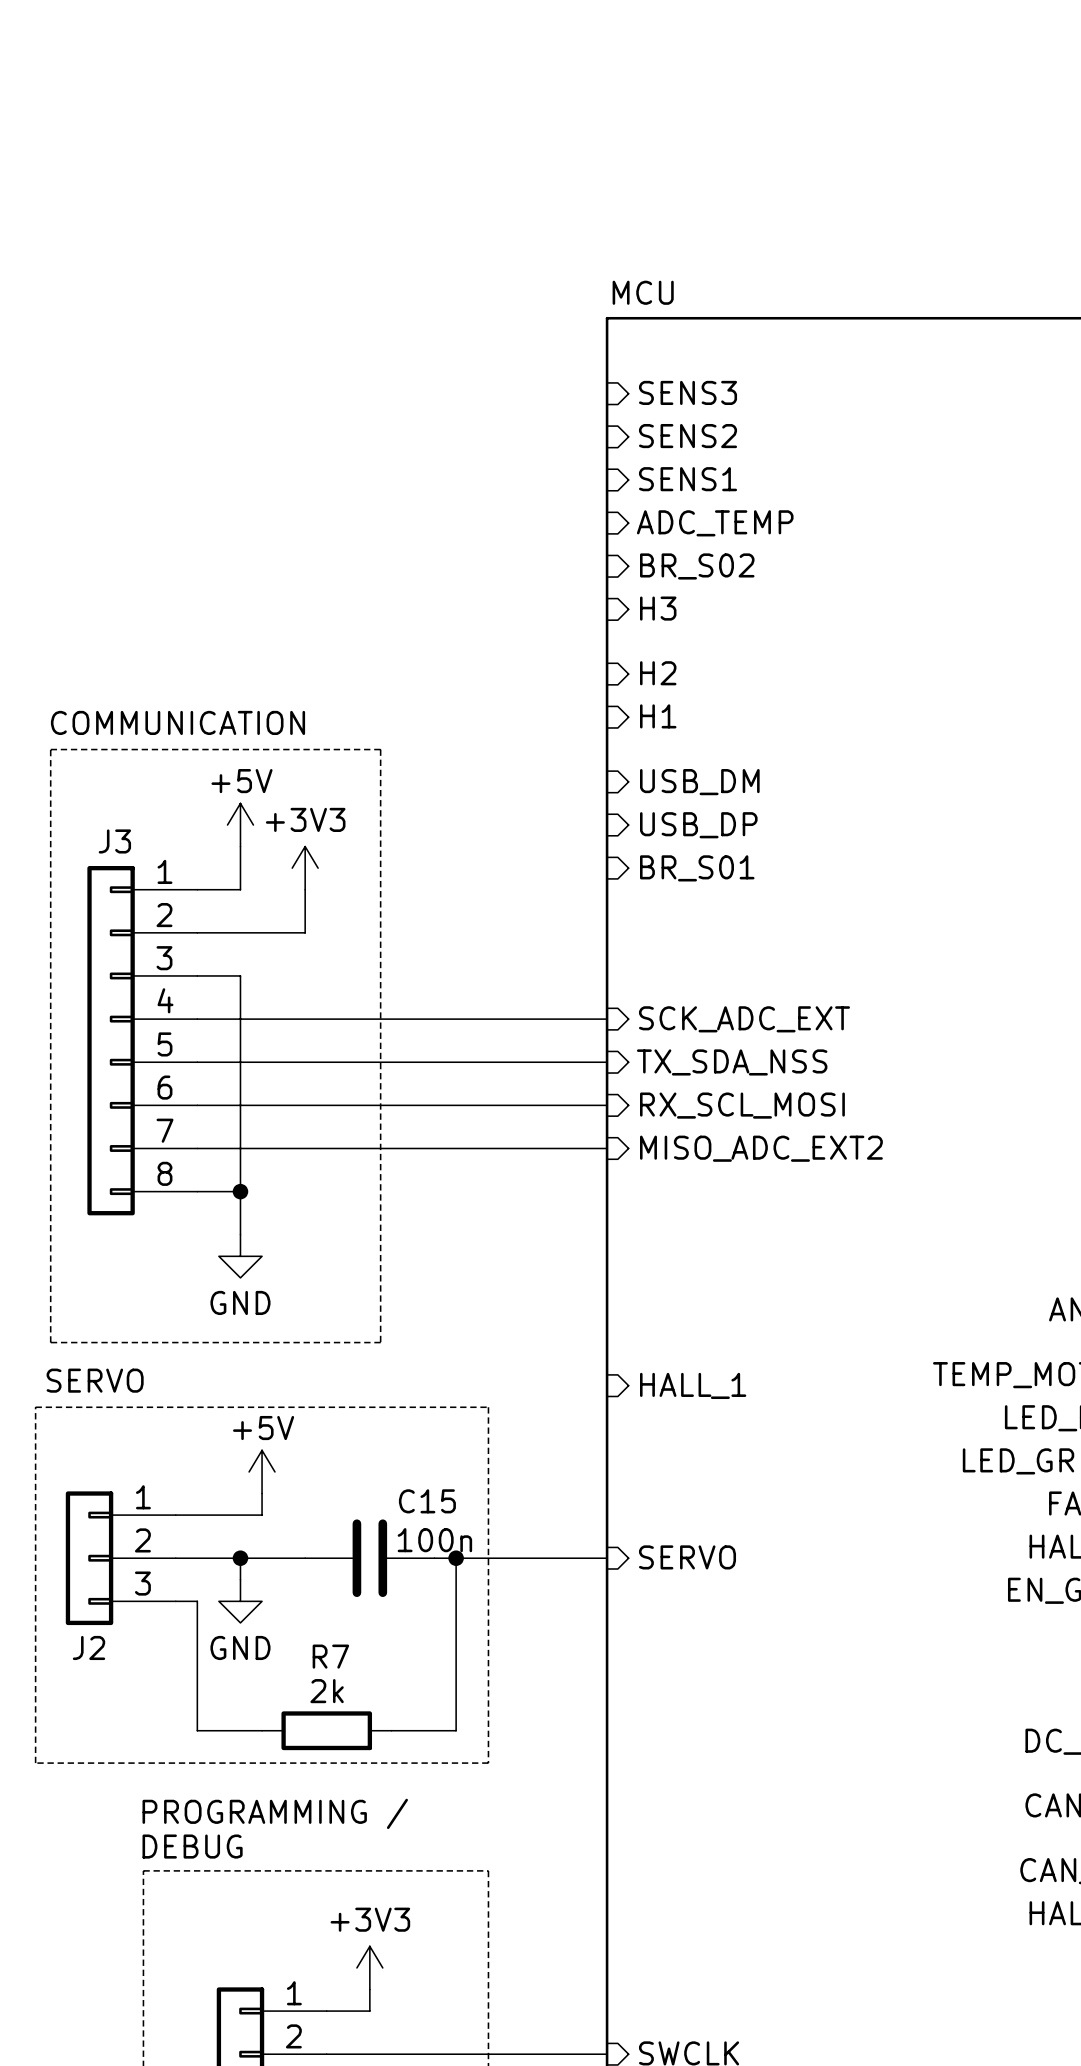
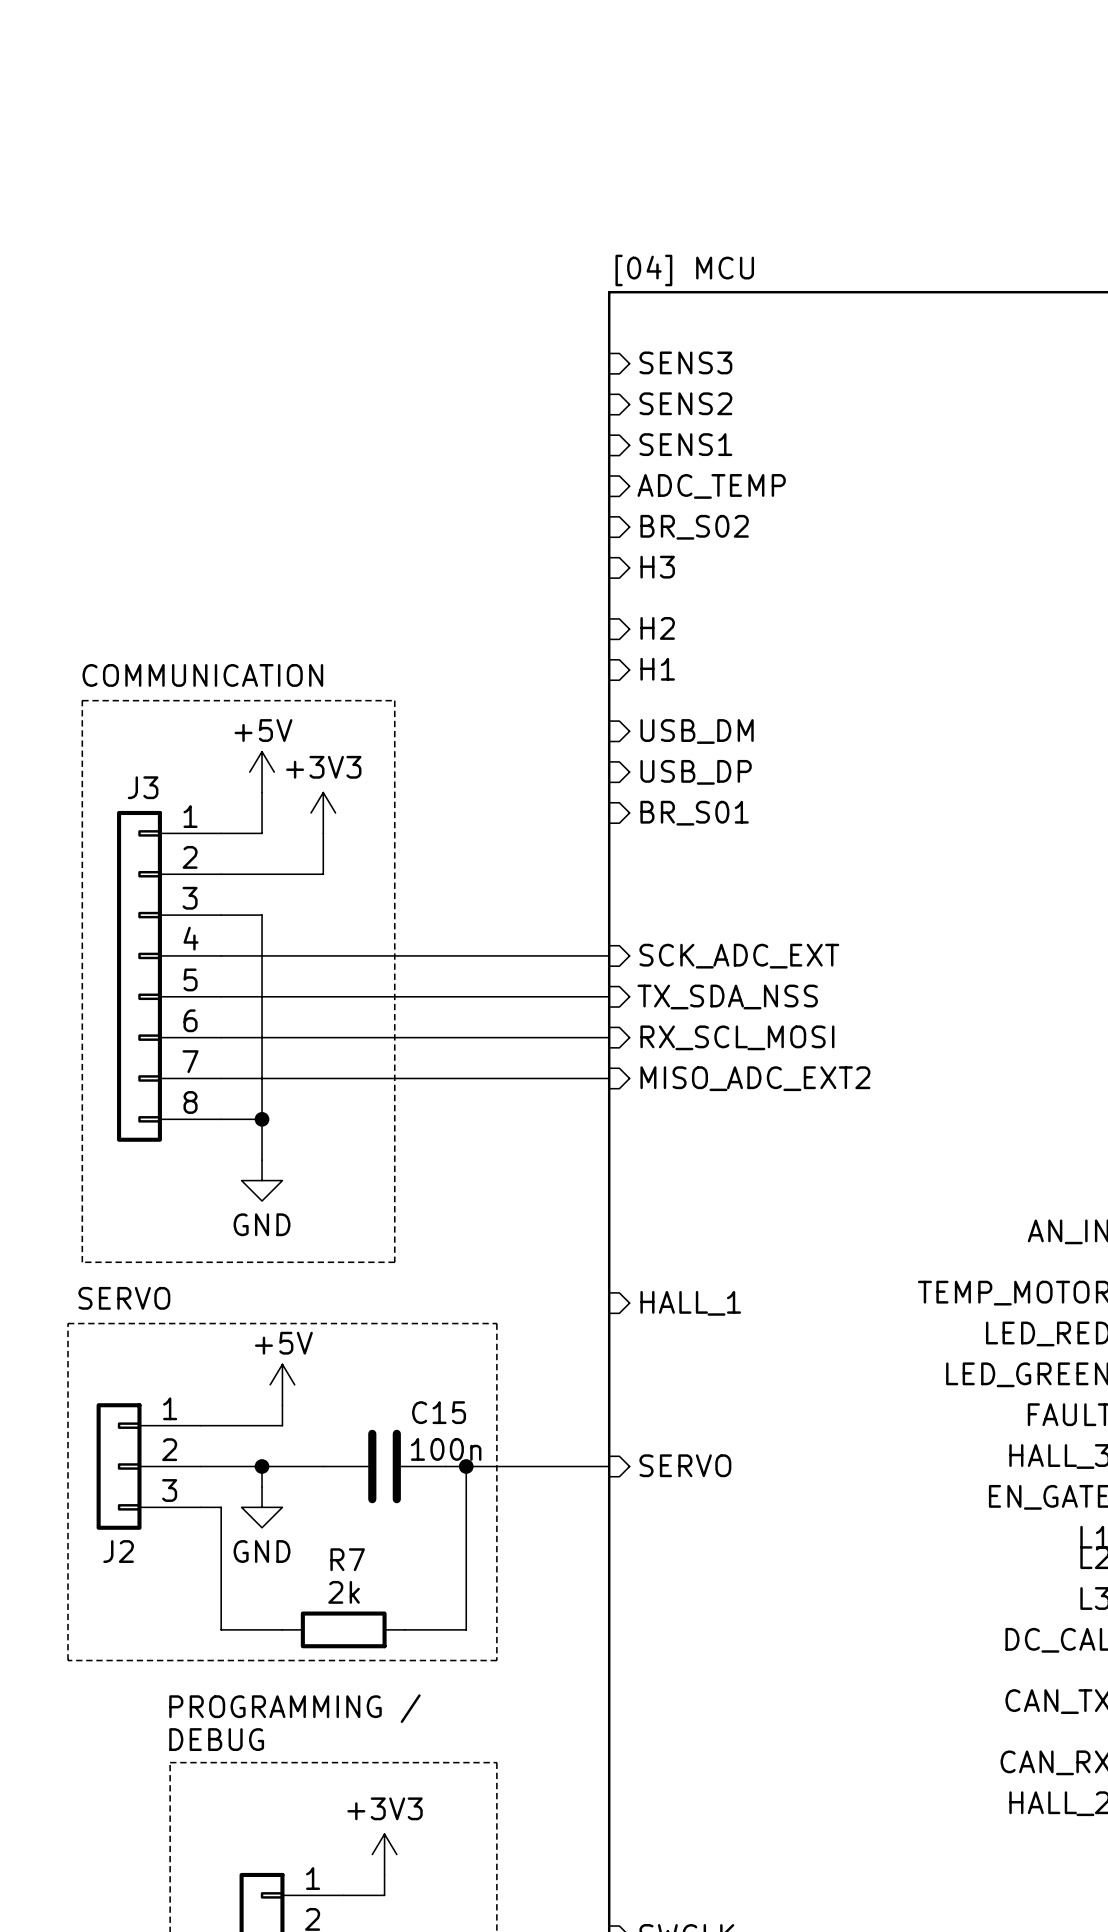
sheet MCU name: MCU (643, 292) -> [04] MCU (684, 270)

